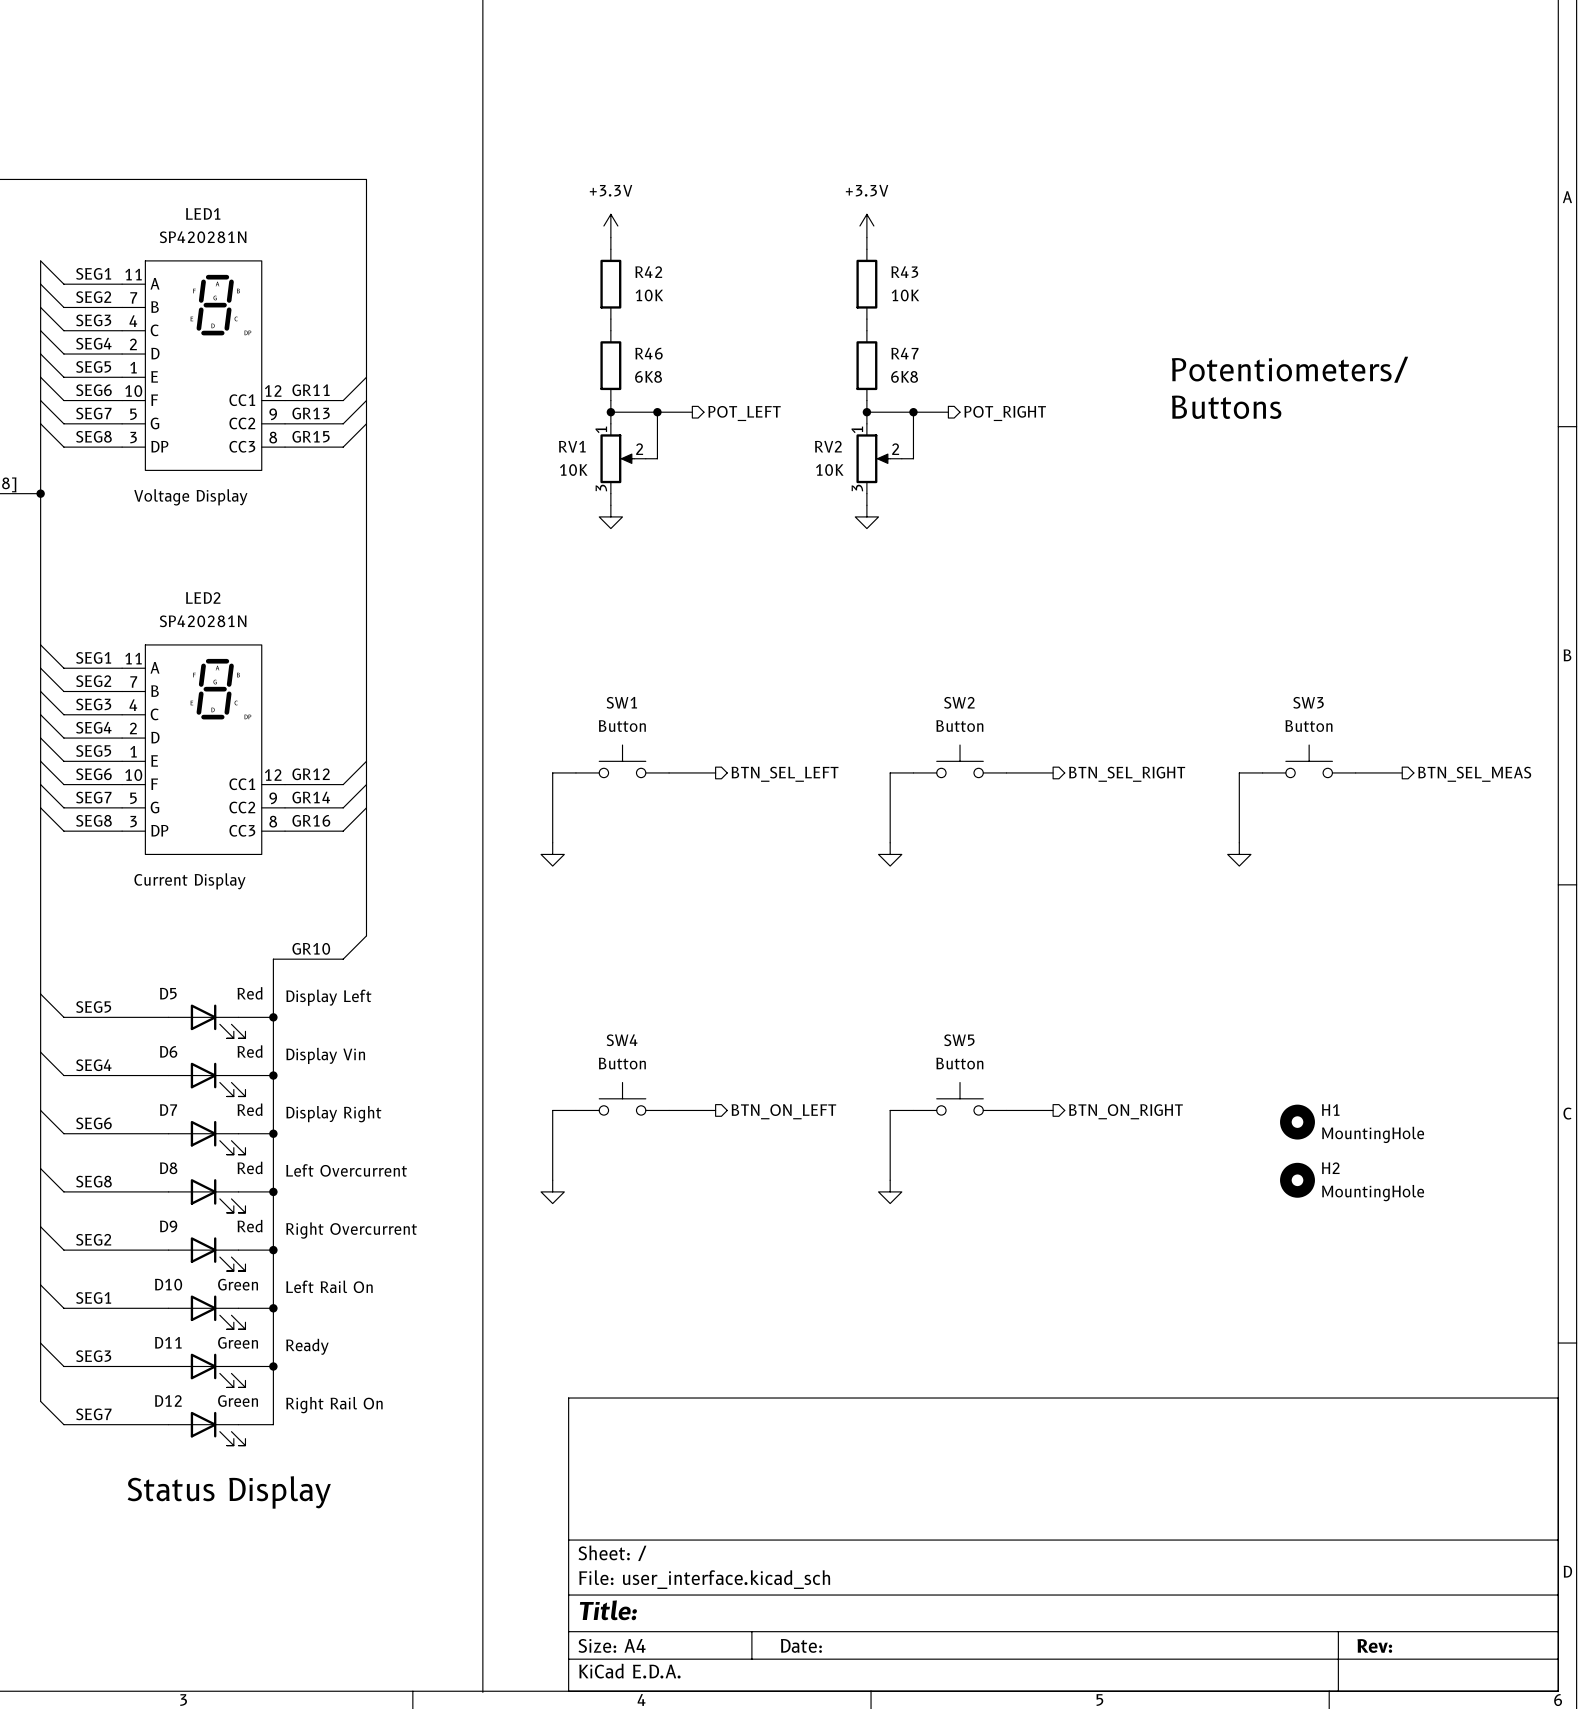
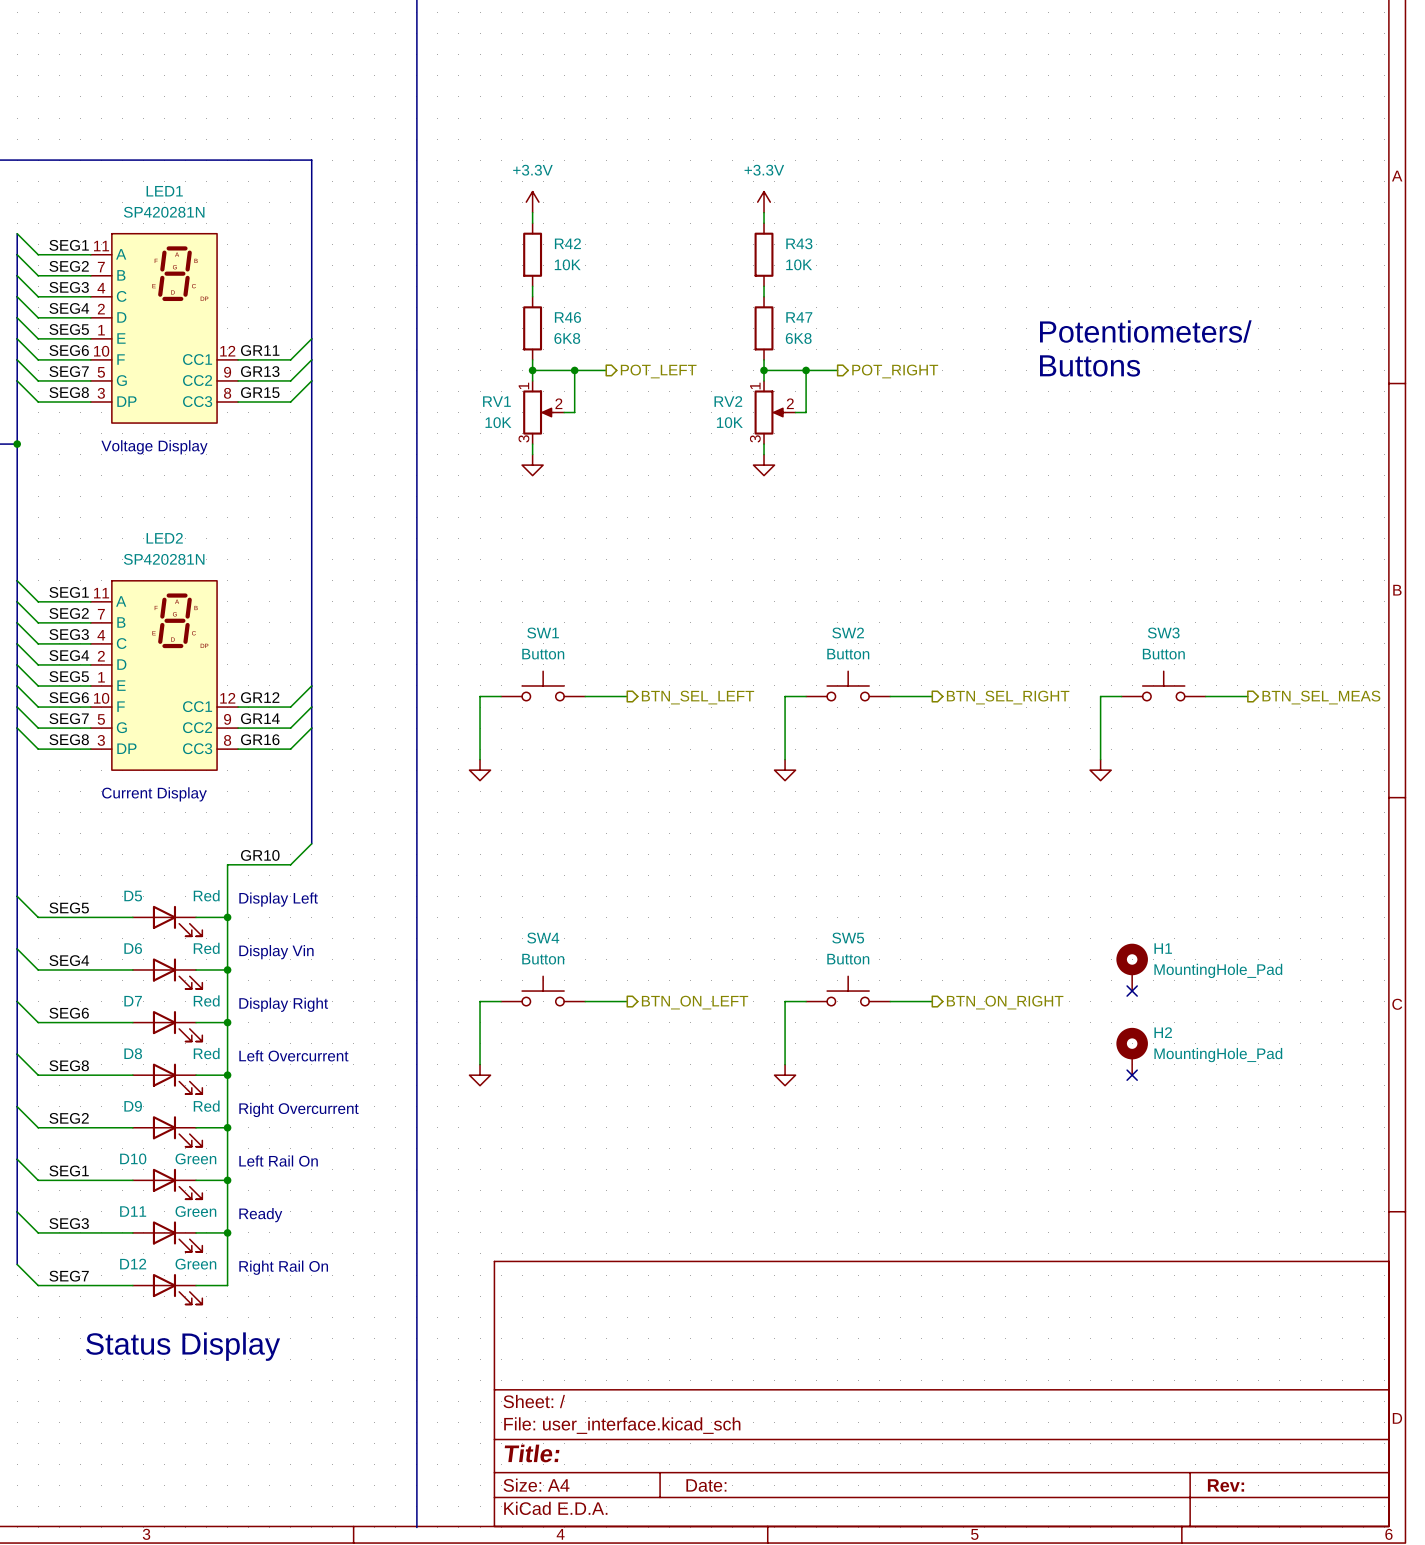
no-connect mark: none -> (1132, 991)
H1 symbol: [1280, 1104, 1315, 1140] -> [1116, 943, 1148, 992]
H1 value: MountingHole (1373, 1134) -> MountingHole_Pad (1218, 970)
H2 symbol: [1280, 1162, 1315, 1198] -> [1116, 1027, 1148, 1076]
no-connect mark: none -> (1132, 1075)
H2 value: MountingHole (1373, 1193) -> MountingHole_Pad (1218, 1055)

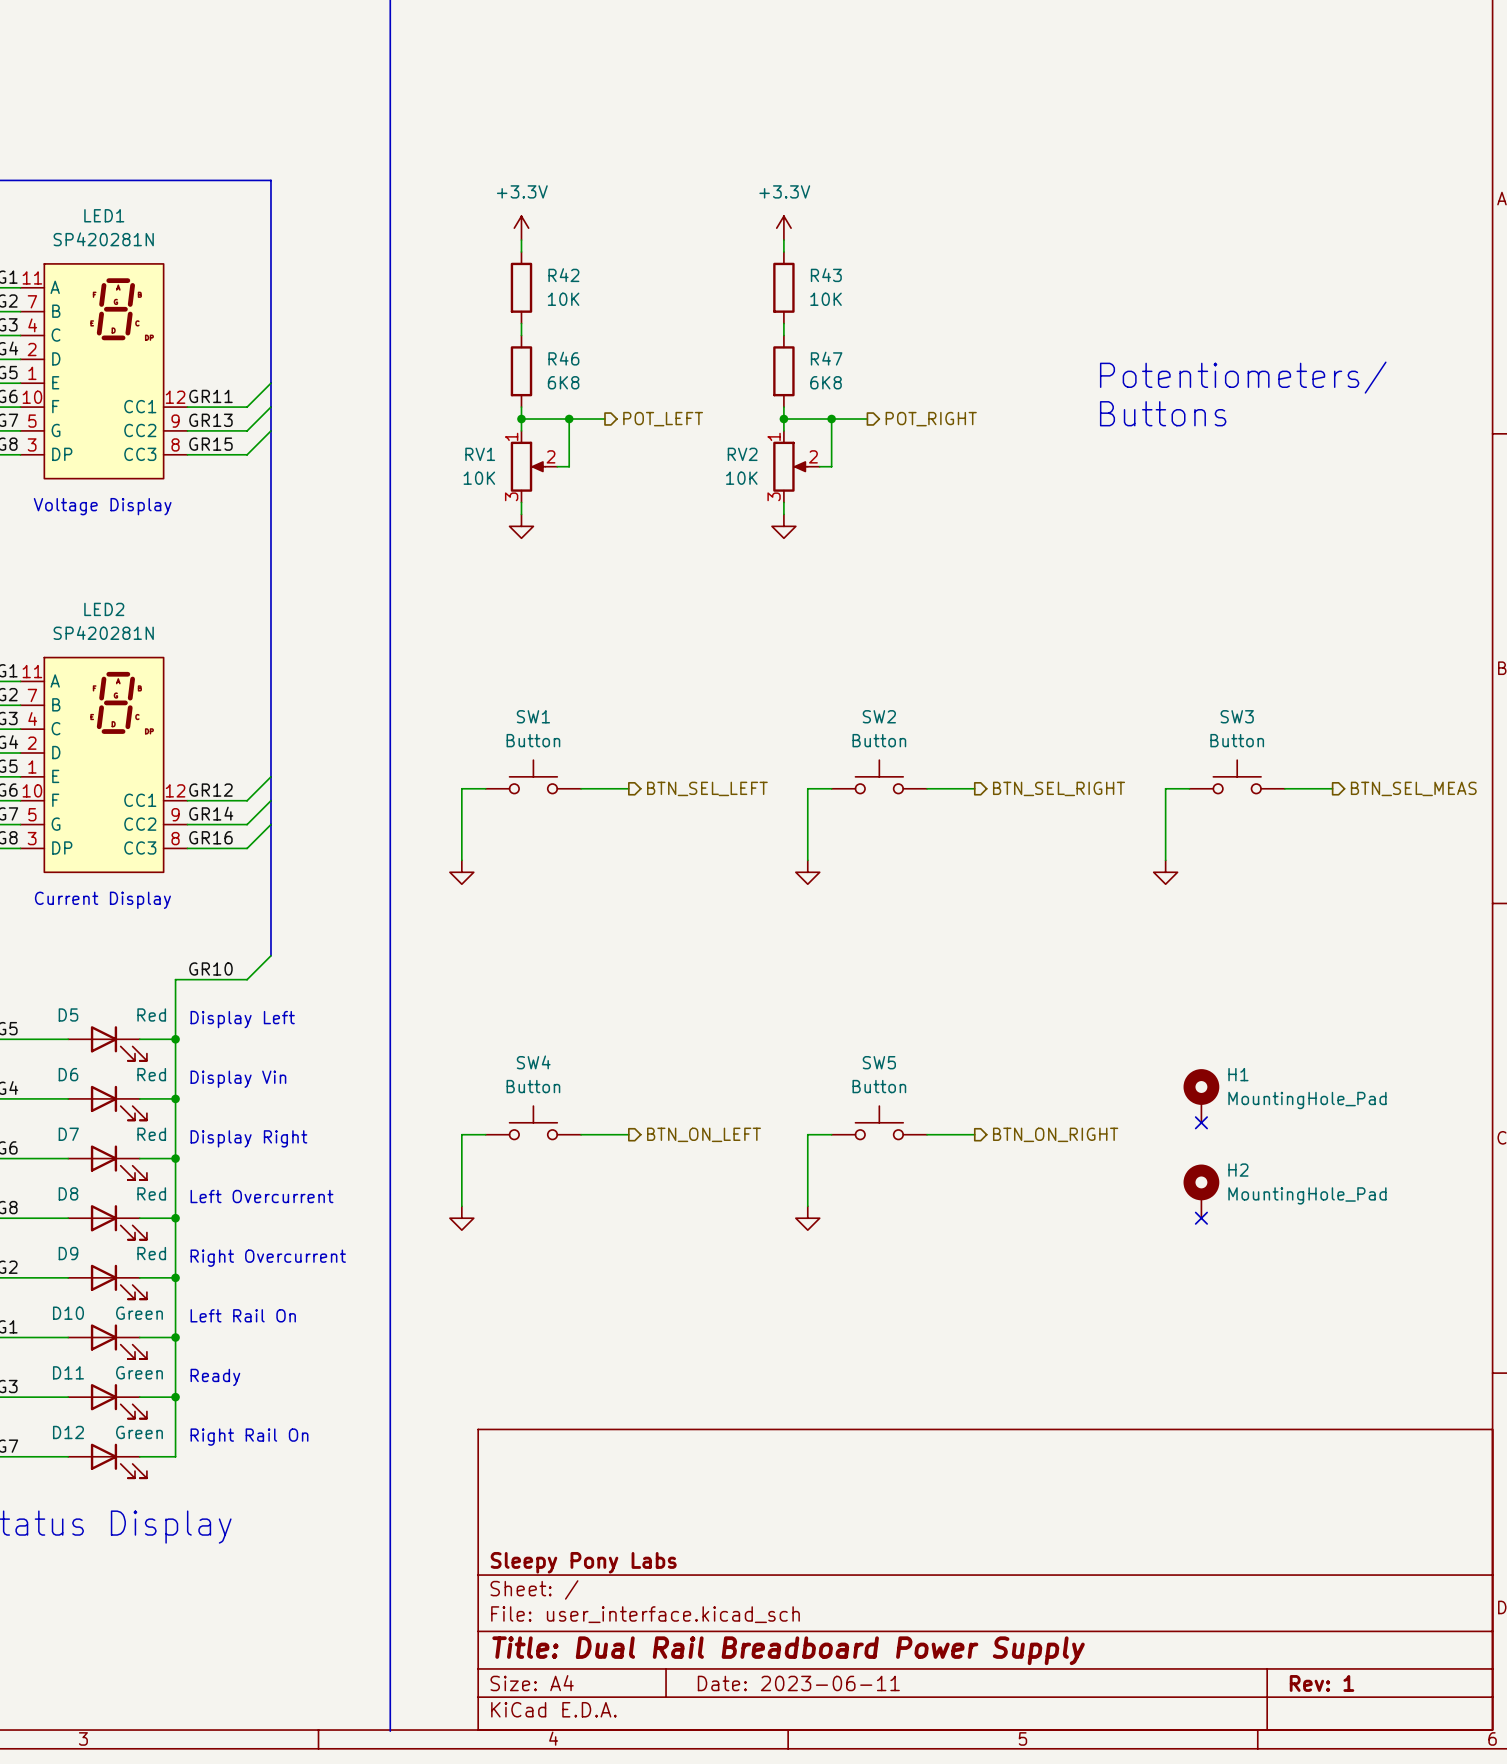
title block: none -> Sleepy Pony Labs (583, 1562)
title block: Title: (532, 1453) -> Title: Dual Rail Breadboard Power Supply (788, 1650)
title block: Date: (706, 1485) -> Date: 2023-06-11 (798, 1683)
title block: Rev: (1226, 1485) -> Rev: 1 (1322, 1683)

